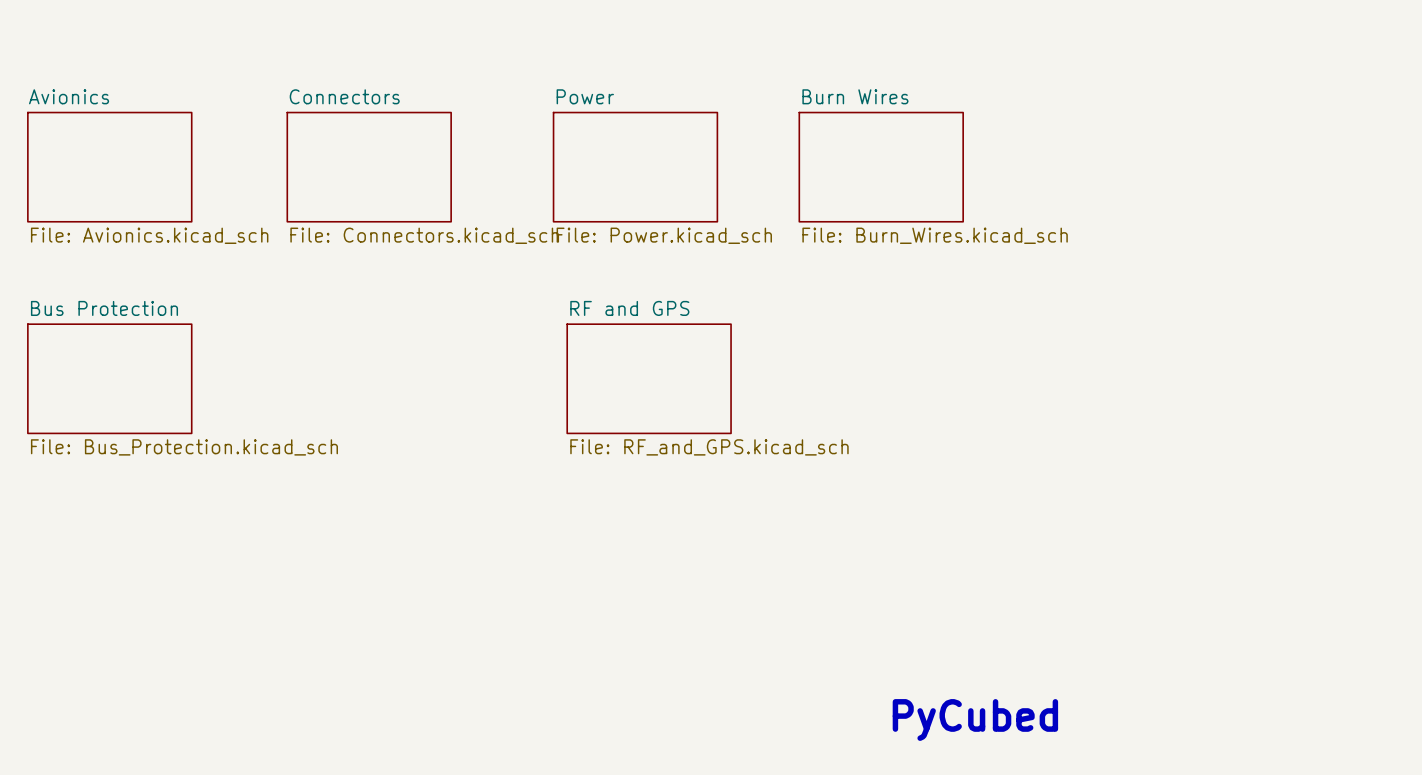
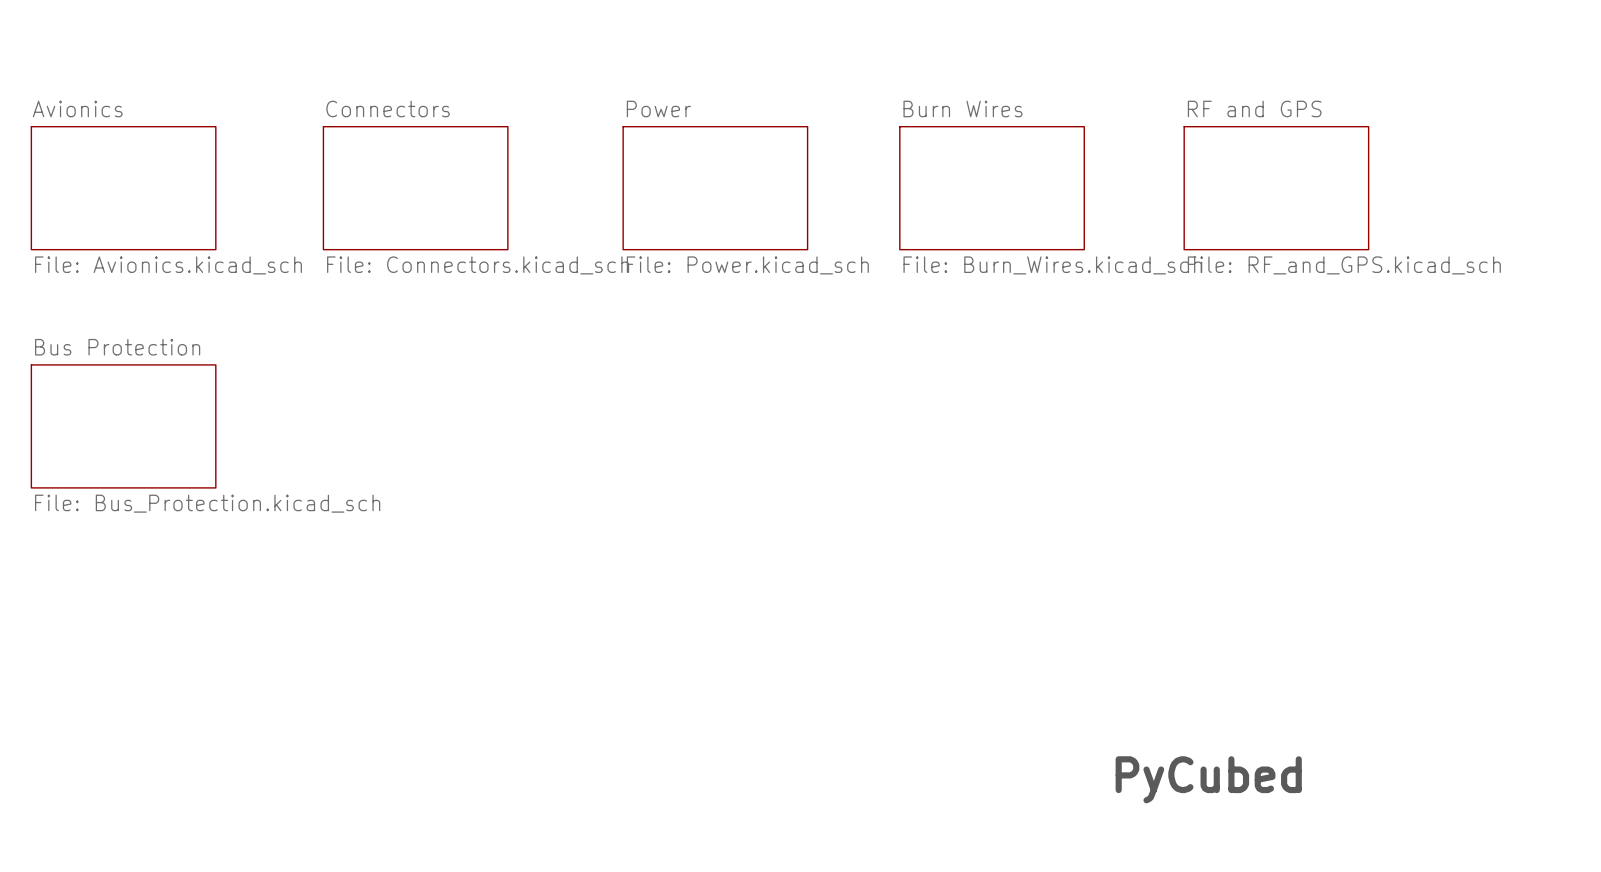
sheet RF and GPS: none -> File: RF_and_GPS.kicad_sch (1276, 188)
sheet RF and GPS: File: RF_and_GPS.kicad_sch (649, 378) -> none
text position: PyCubed (975, 720) -> PyCubed (1208, 779)

